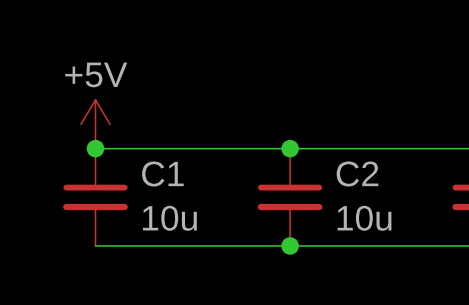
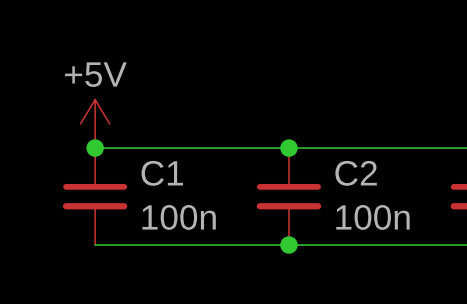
C1 value: 10u (169, 218) -> 100n (179, 217)
C2 value: 10u (364, 218) -> 100n (372, 217)

